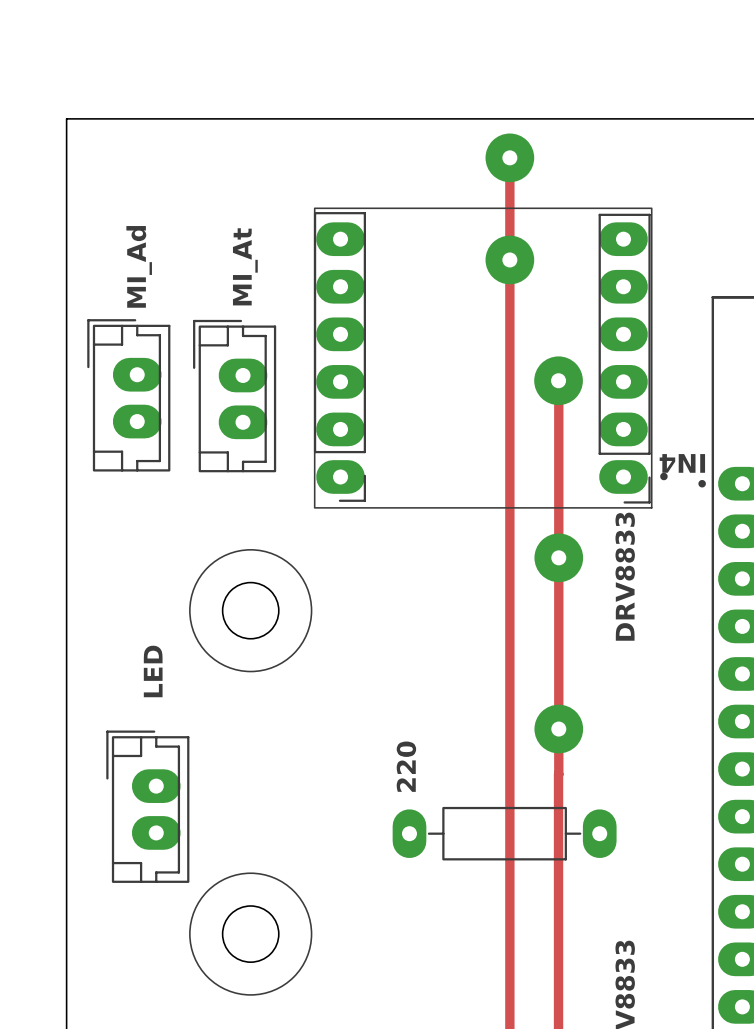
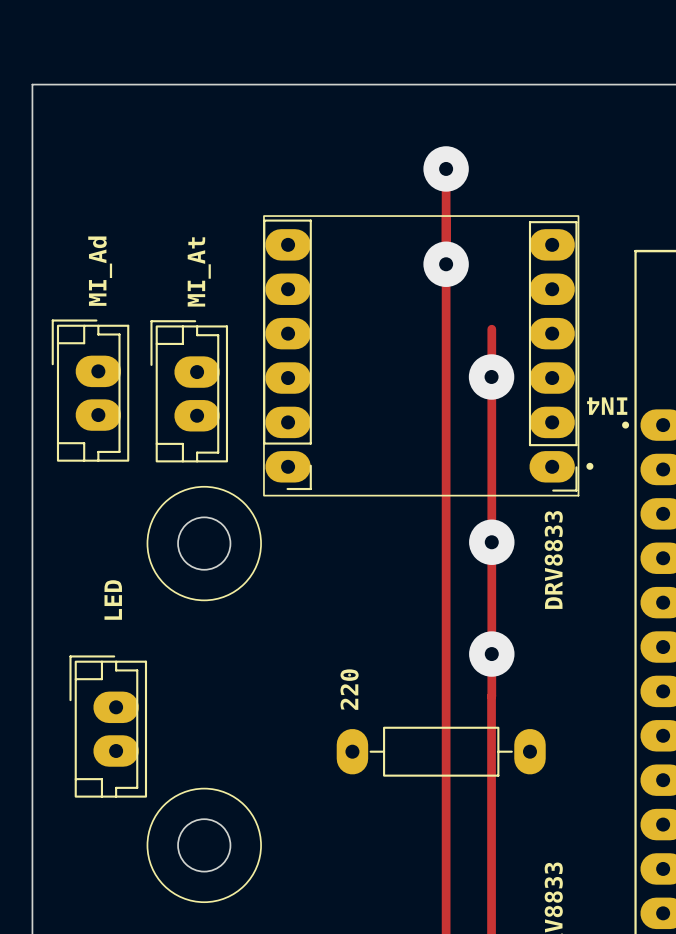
track: (509, 157) (509, 209) -> none
via: (509, 157) -> none
via: none -> (446, 168)
via: (509, 259) -> none
via: none -> (446, 264)
part position: (490, 358) -> (428, 355)
via: (558, 380) -> none
part position: (128, 395) -> (90, 390)
part position: (234, 396) -> (189, 391)
via: none -> (491, 376)
via position: (558, 557) -> (491, 542)

